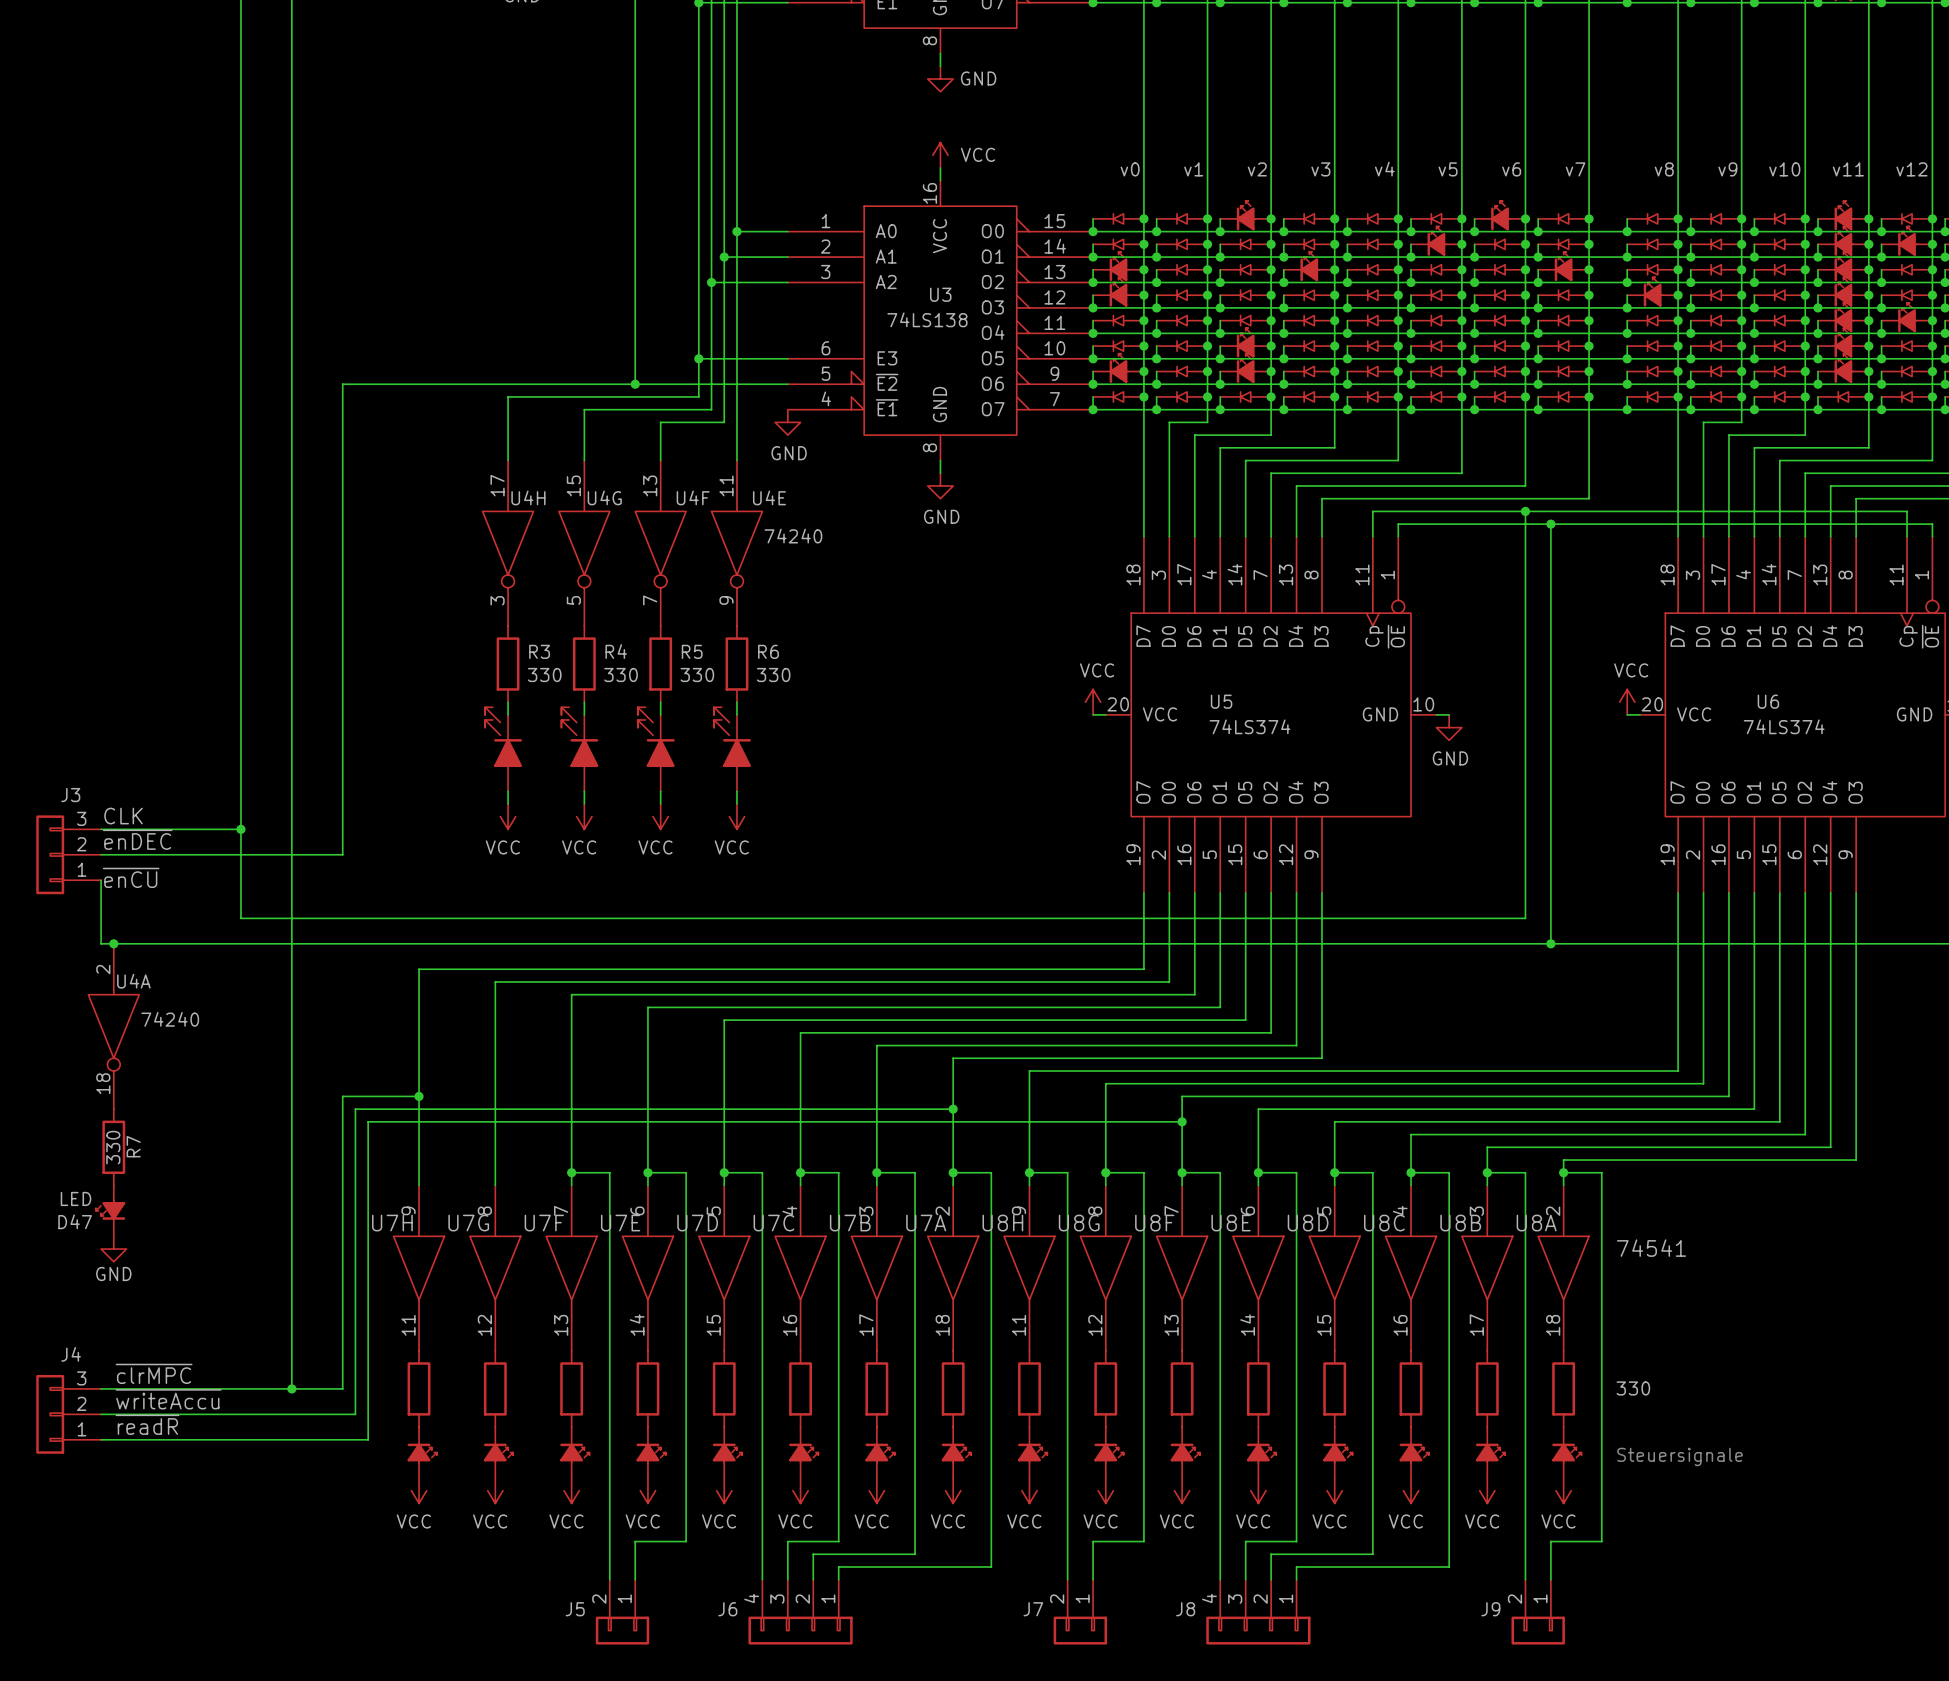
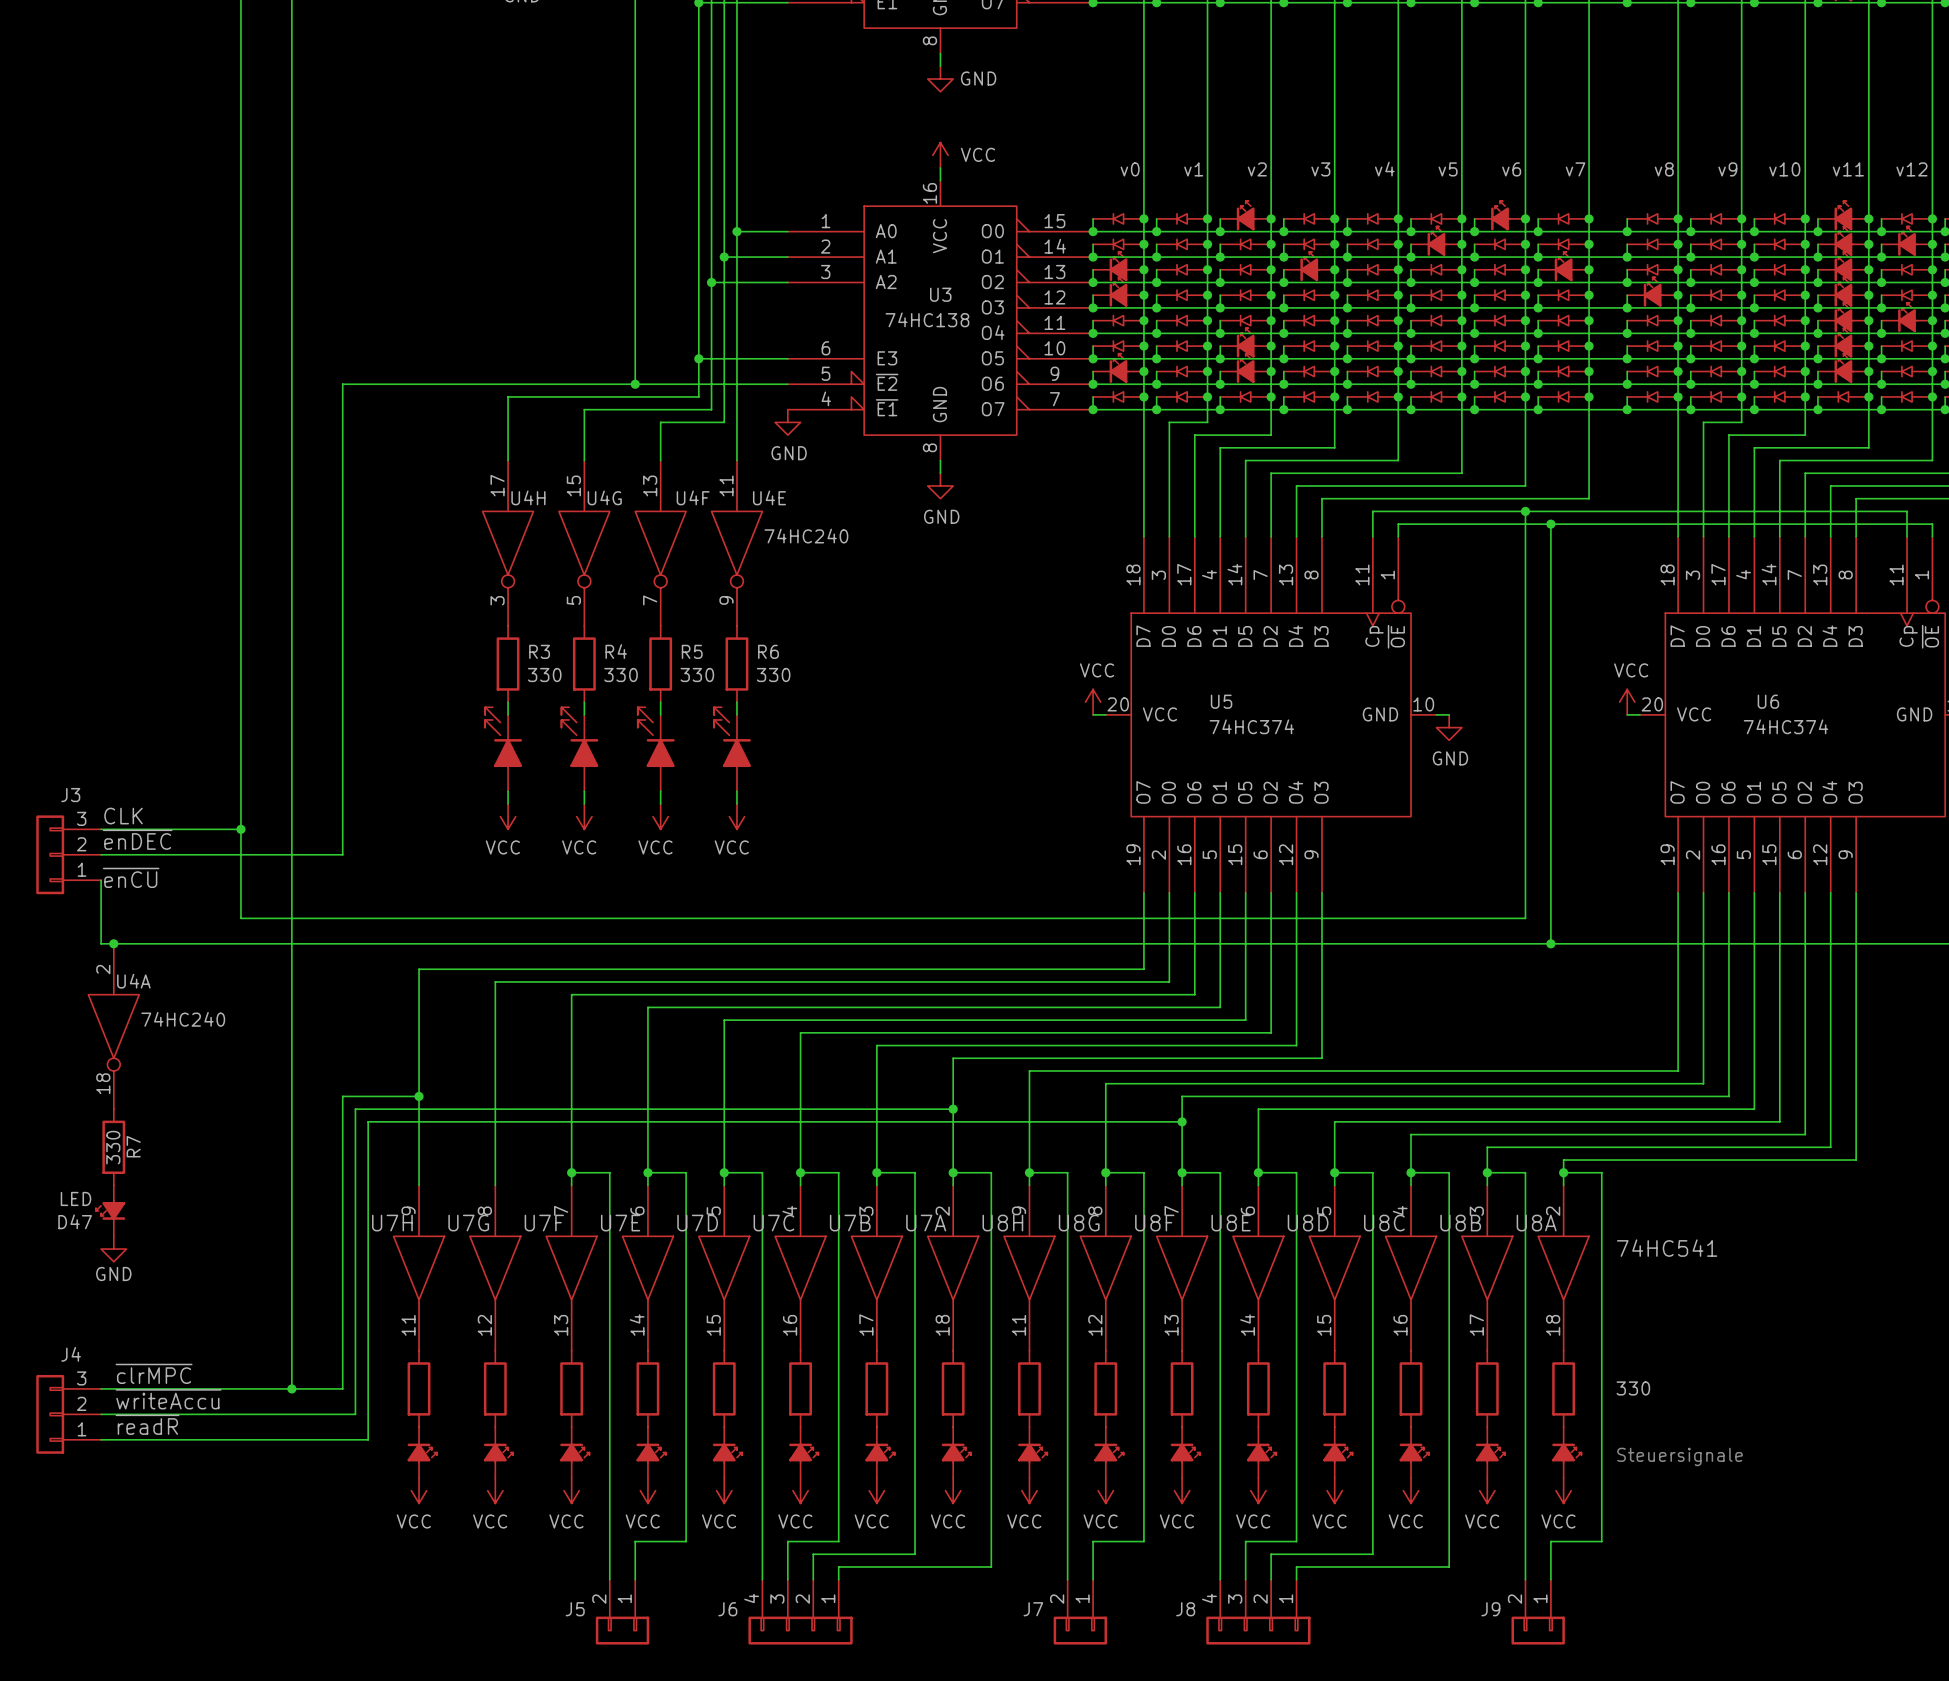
U3 value: 74LS138 (927, 319) -> 74HC138 (927, 319)
U4E value: 74240 (793, 536) -> 74HC240 (806, 536)
U5 value: 74LS374 (1250, 726) -> 74HC374 (1251, 726)
U6 value: 74LS374 (1784, 726) -> 74HC374 (1785, 726)
U4A value: 74240 (170, 1019) -> 74HC240 (183, 1019)
U8A value: 74541 (1651, 1248) -> 74HC541 (1667, 1248)

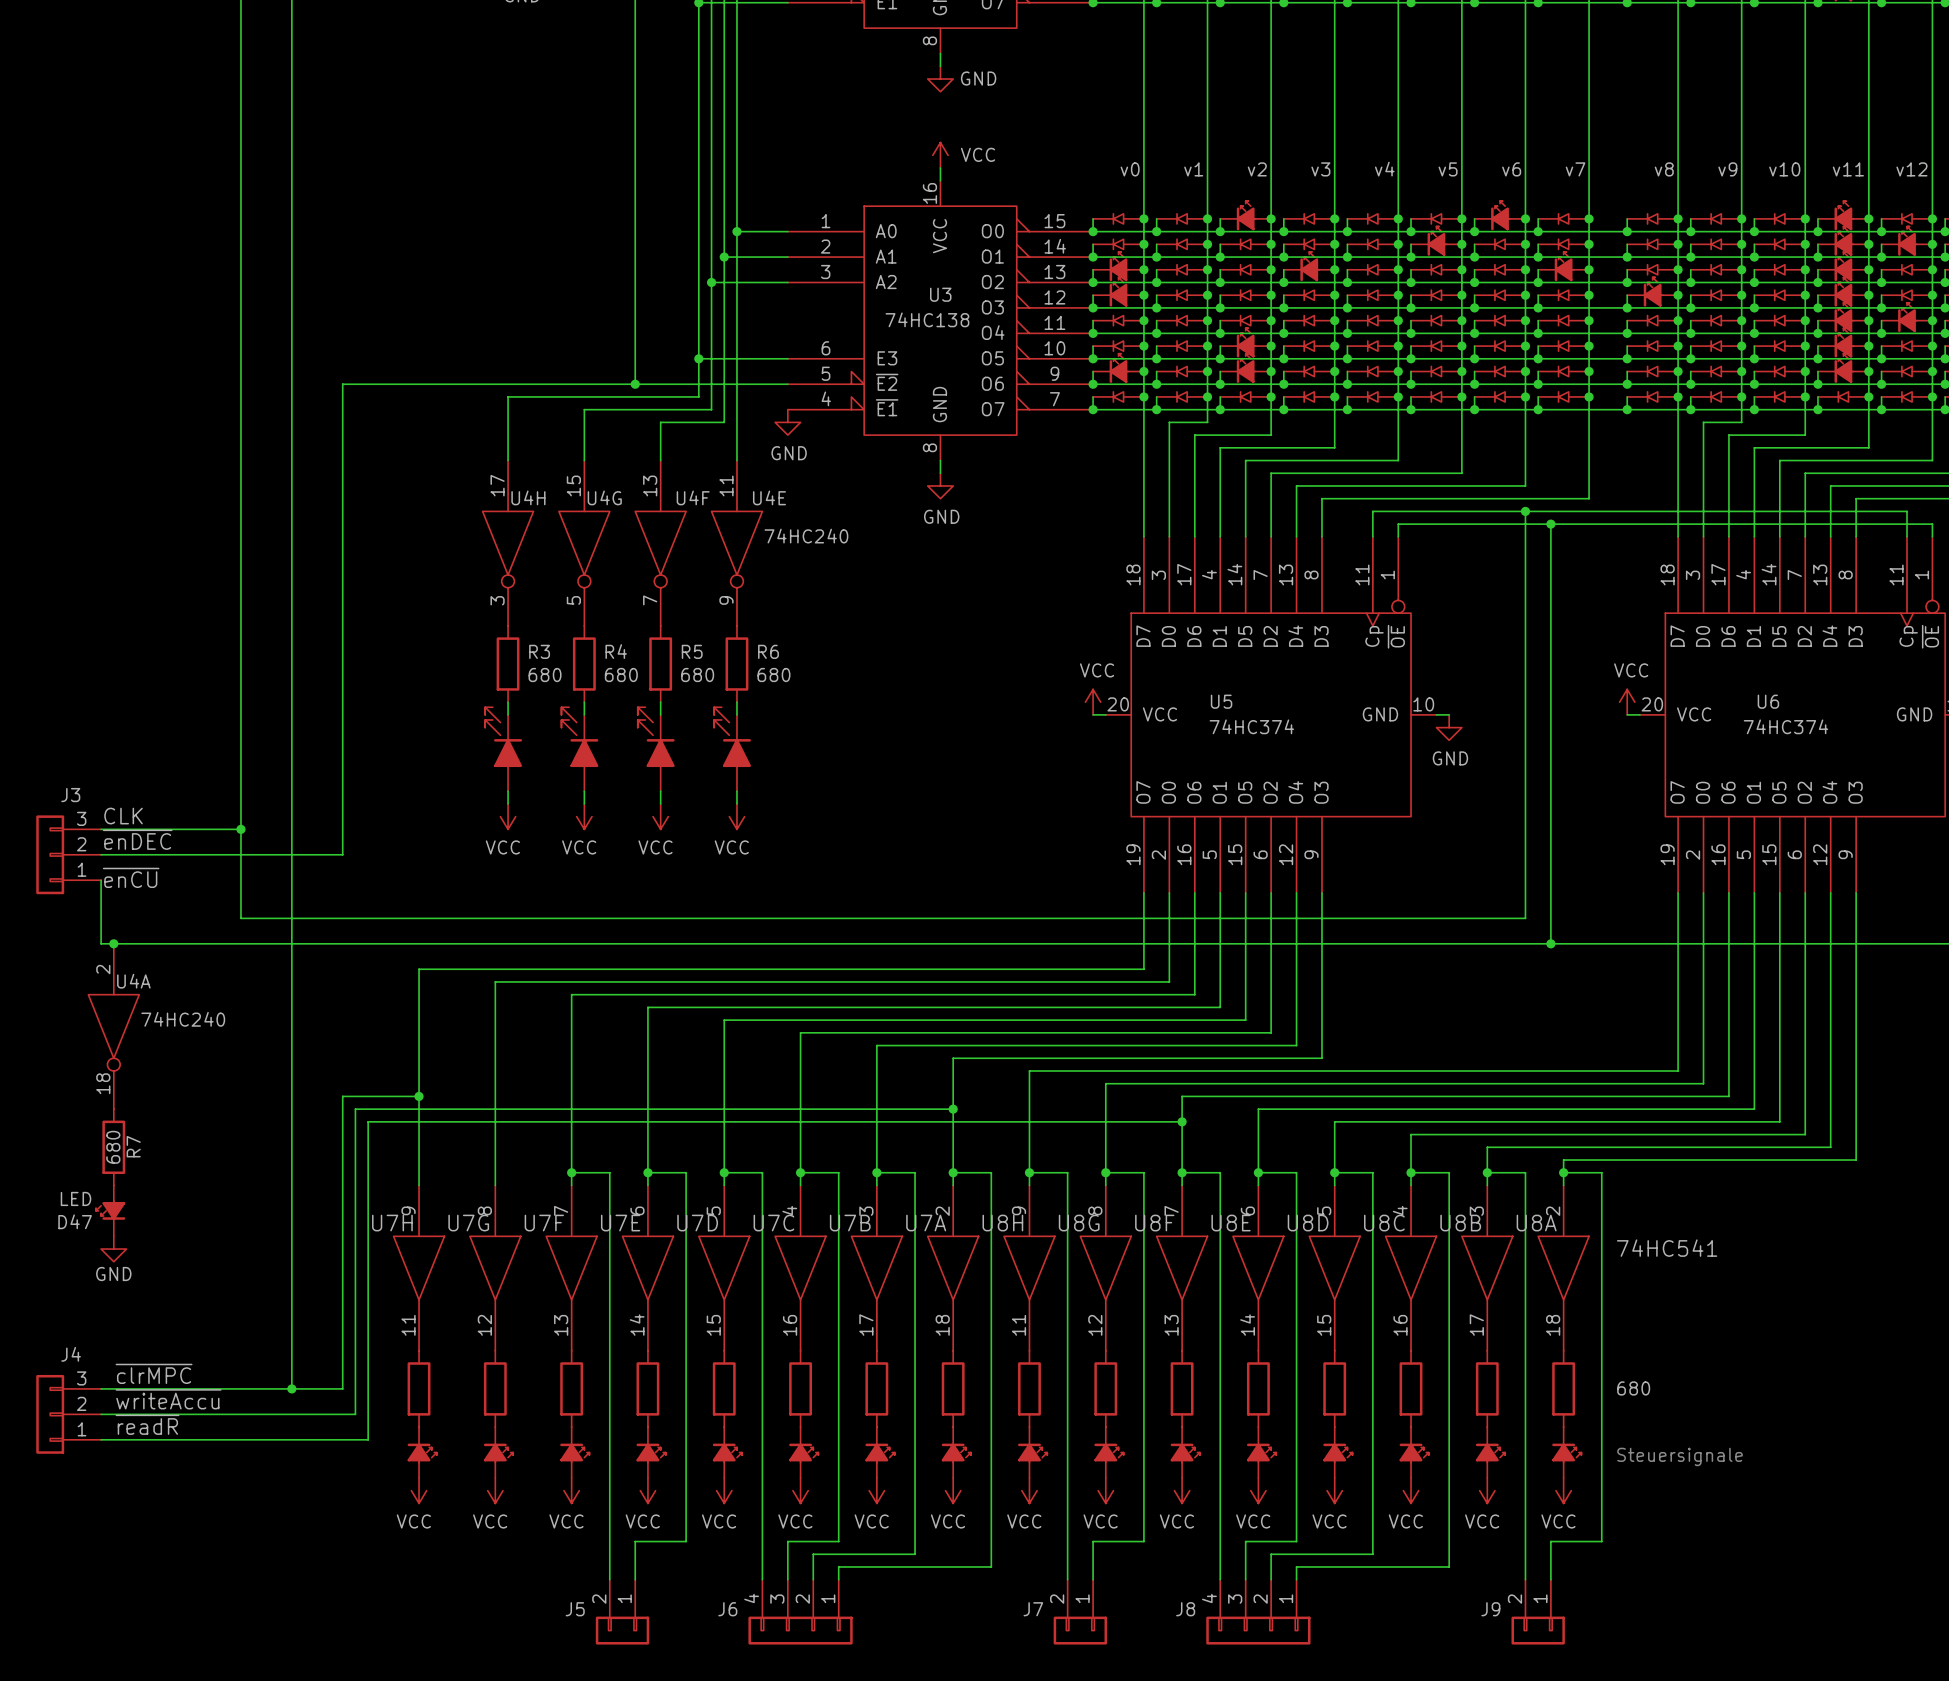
R3 value: 330 (544, 675) -> 680 (545, 675)
R4 value: 330 (621, 675) -> 680 (621, 675)
R5 value: 330 (697, 675) -> 680 (697, 675)
R6 value: 330 (773, 675) -> 680 (773, 675)
R7 value: 330 (113, 1147) -> 680 (113, 1147)
part value: 330 (1633, 1388) -> 680 (1633, 1388)

